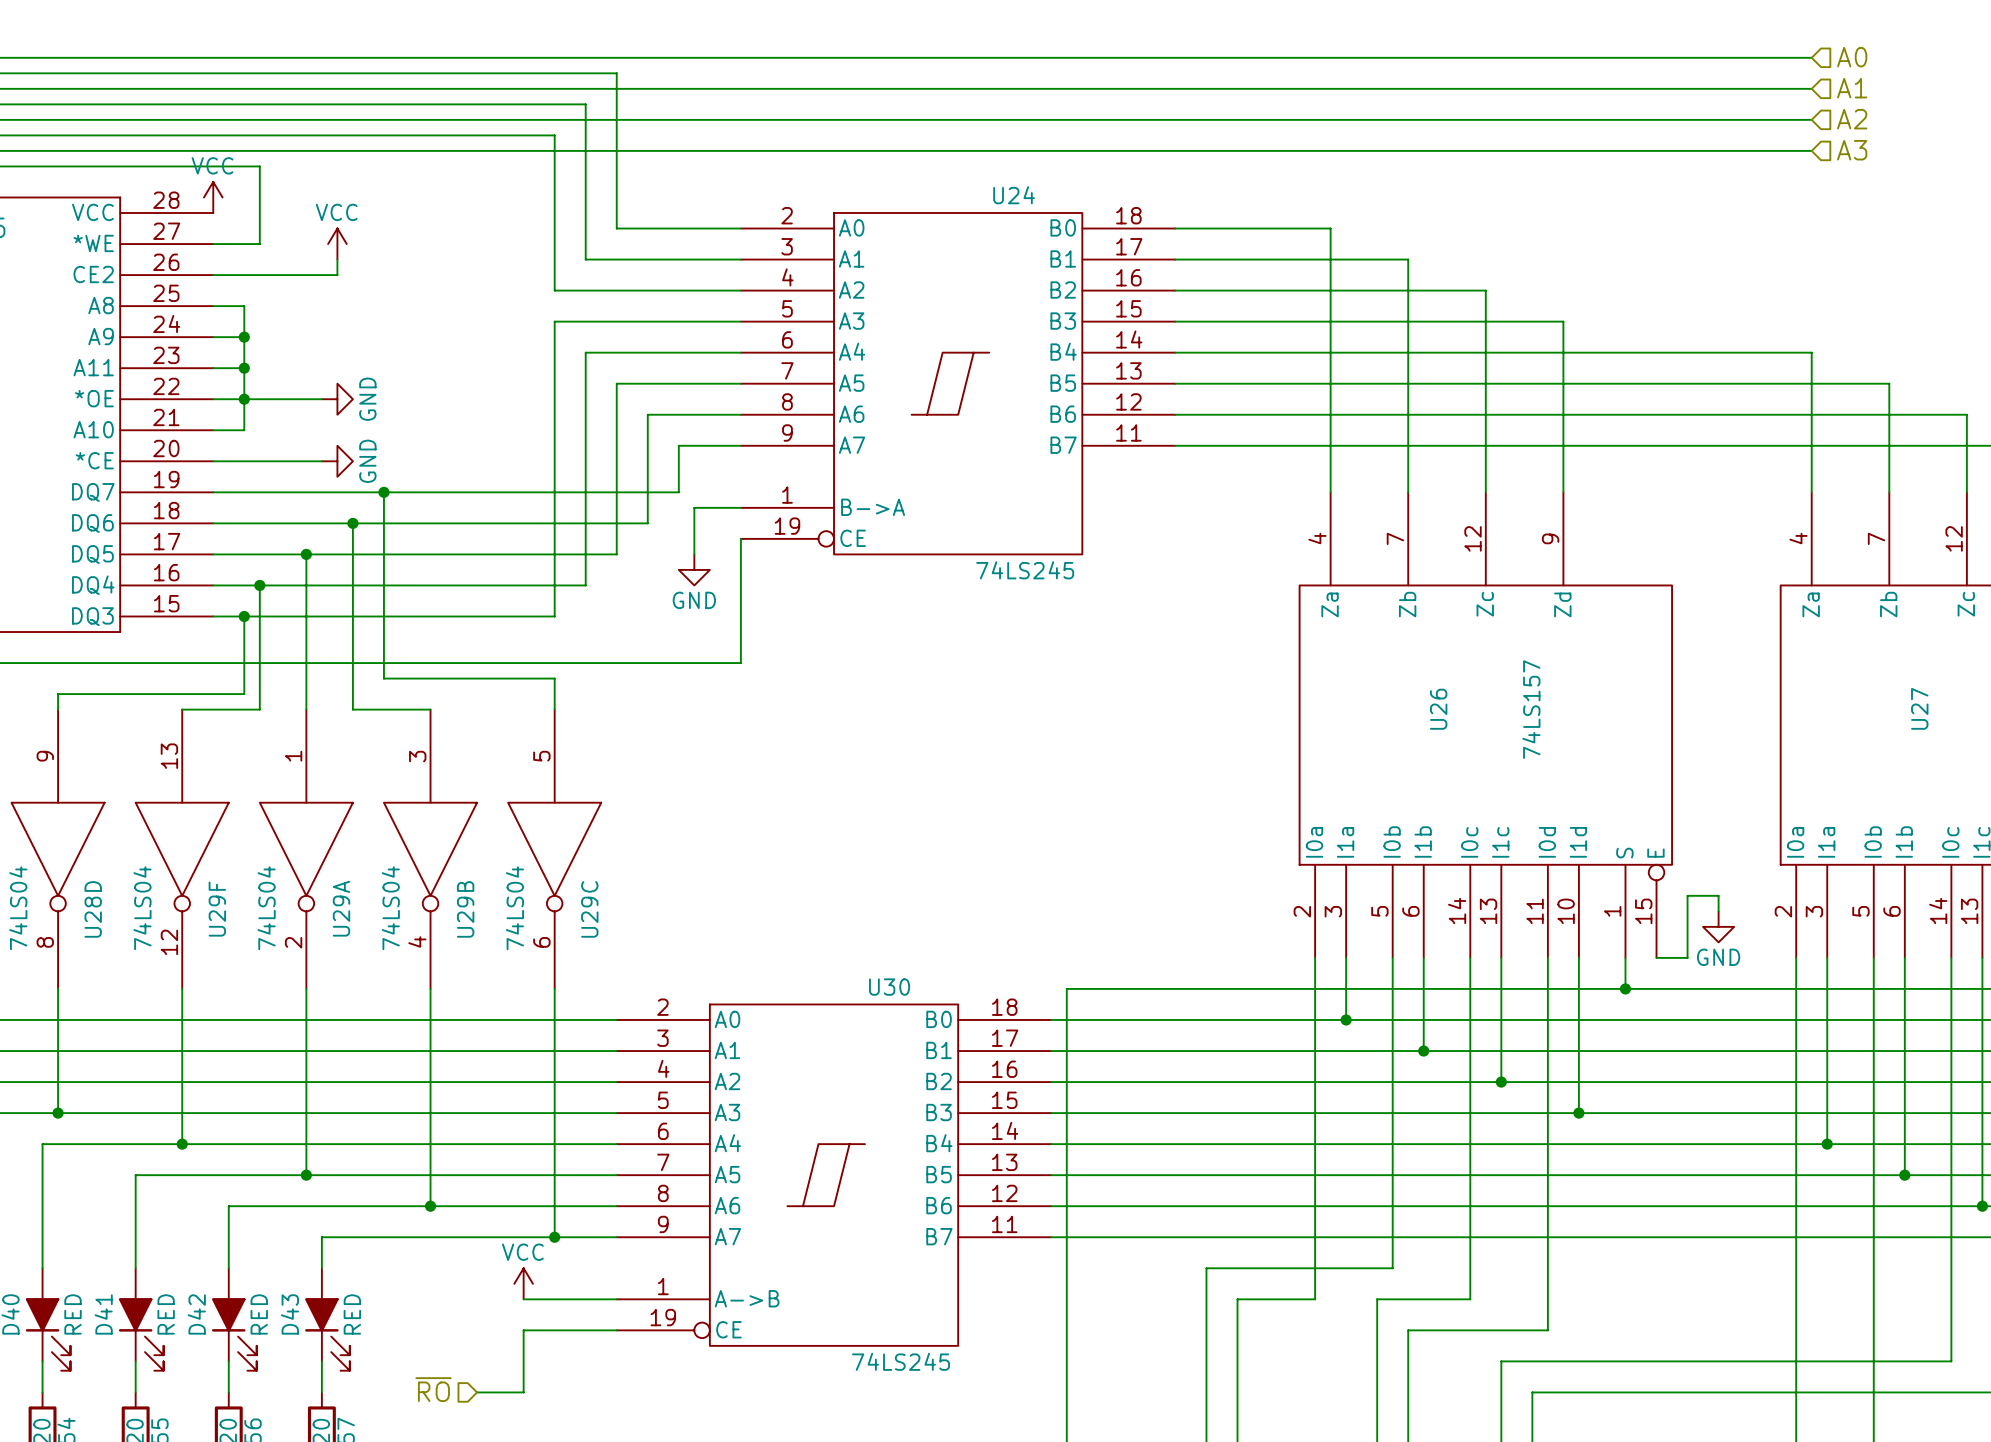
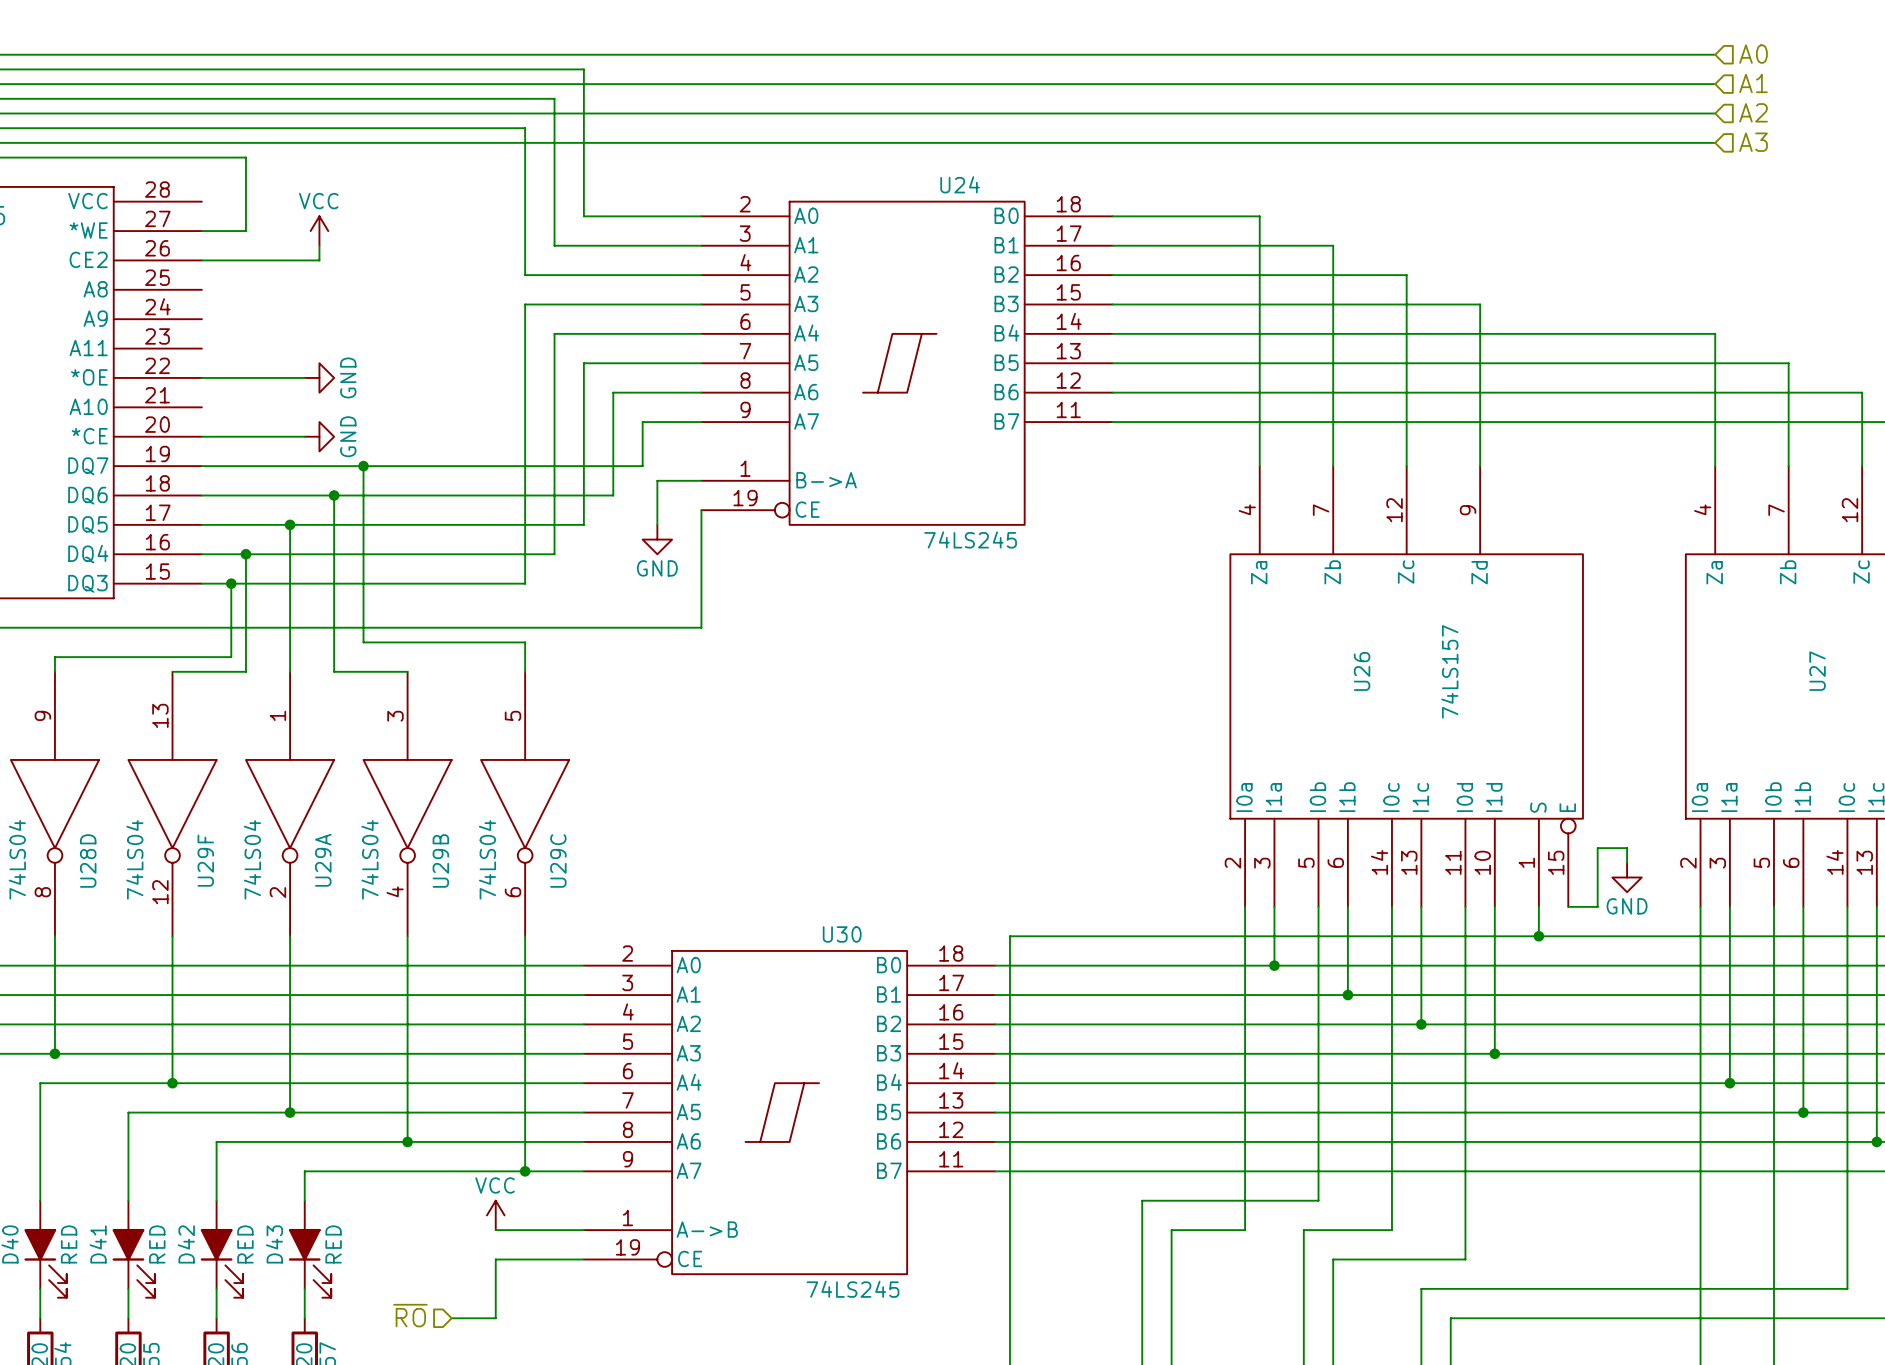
power symbol: VCC (213, 197) -> none
wire: (213, 306) (244, 306) (244, 430) (213, 430) -> none
wire: (213, 337) (244, 337) -> none
junction: (244, 337) -> none
wire: (213, 368) (244, 368) -> none
junction: (244, 368) -> none
junction: (244, 399) -> none

